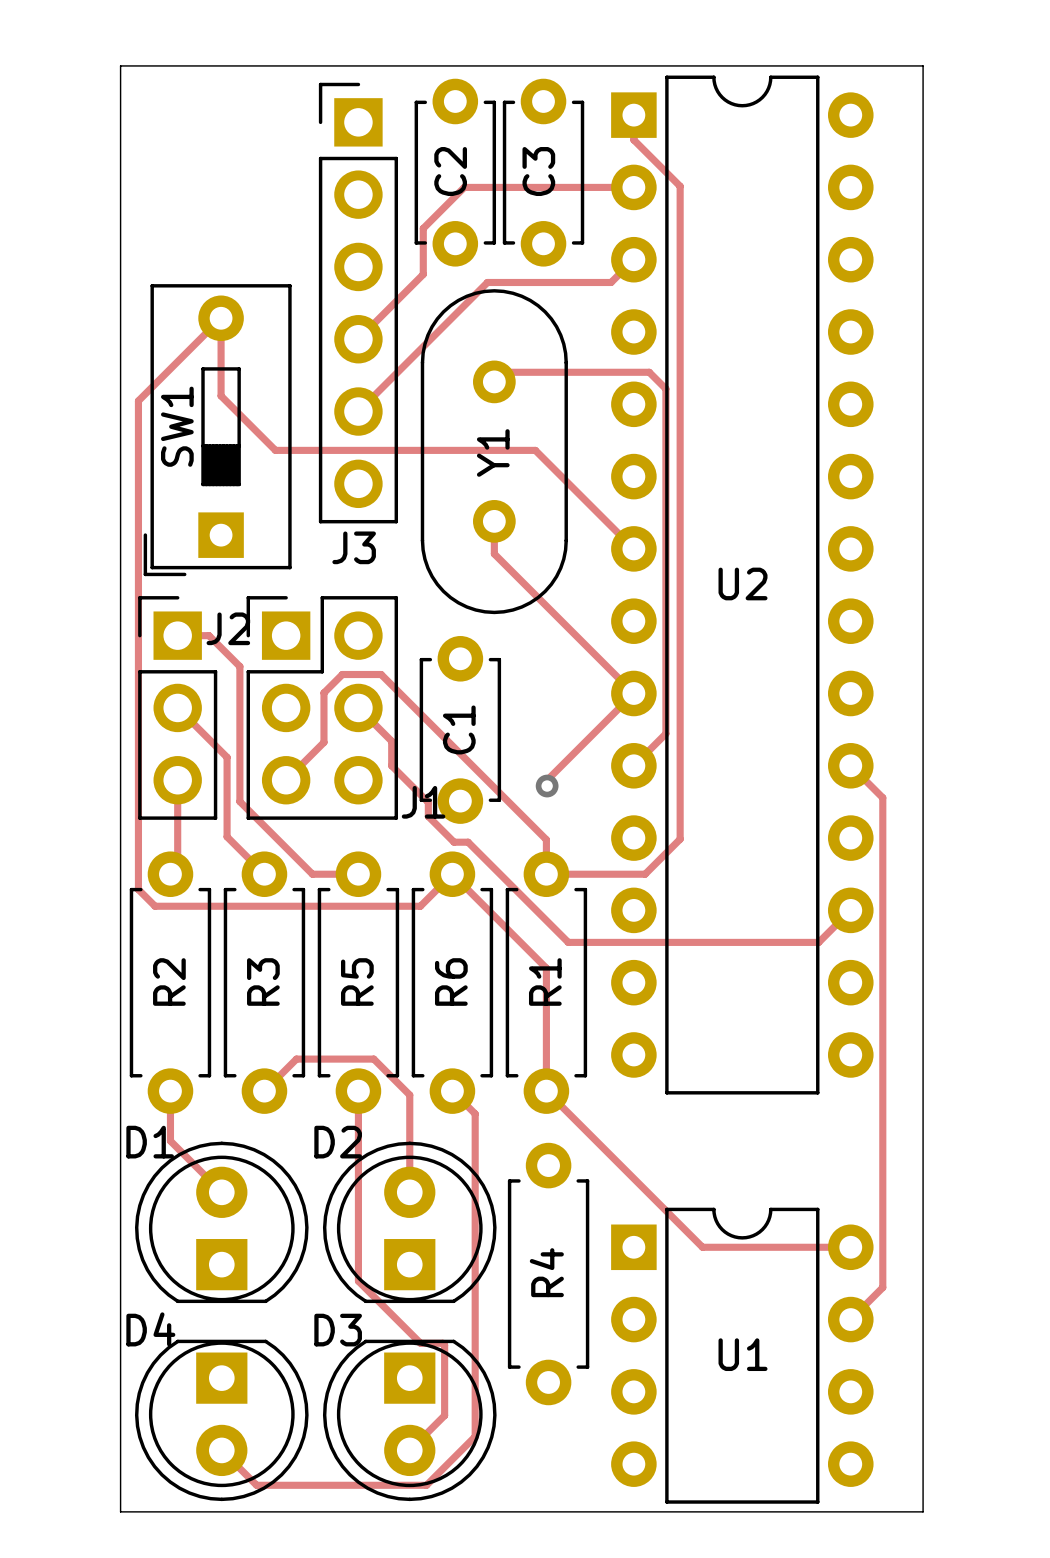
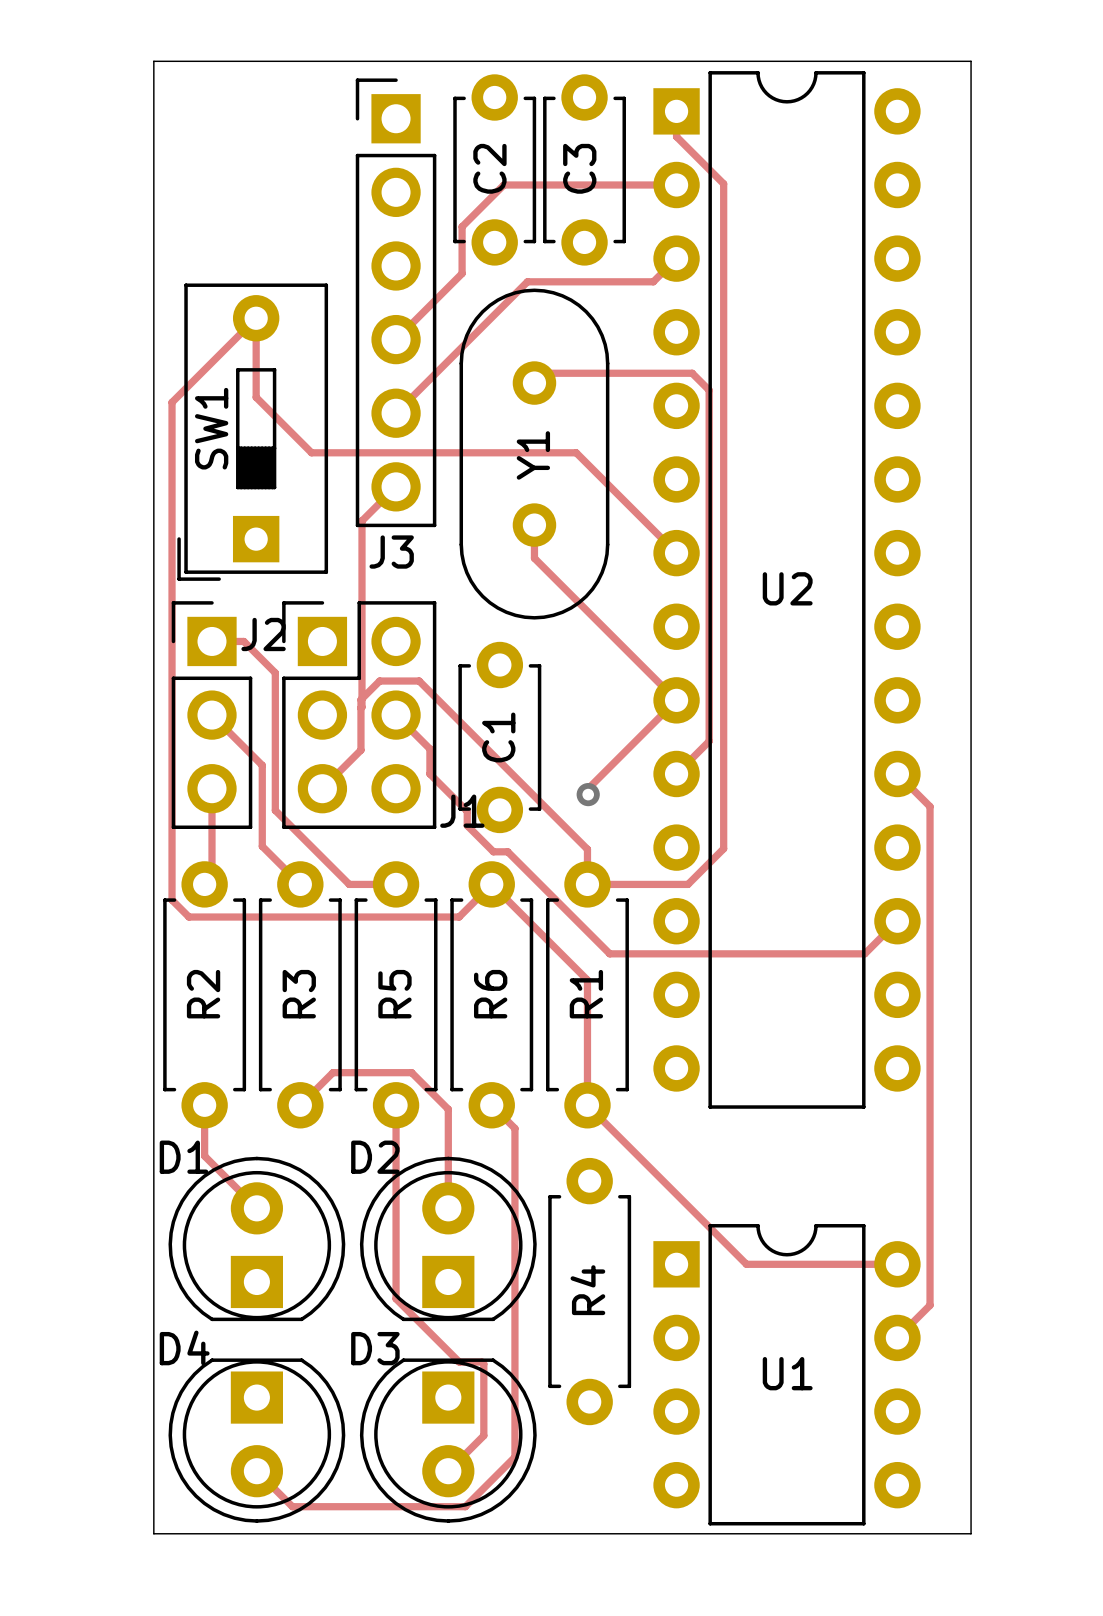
track: none -> (396, 486) (361, 520) (360, 708)

